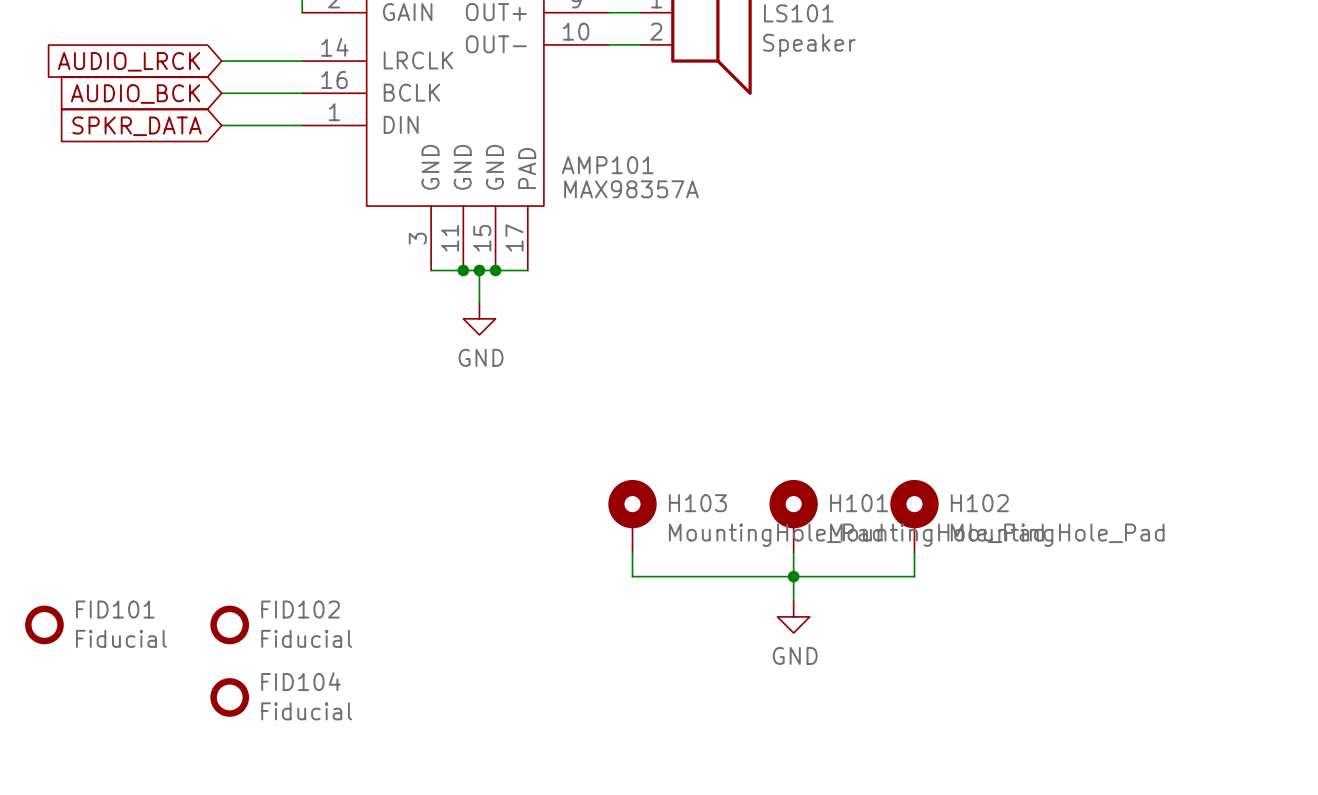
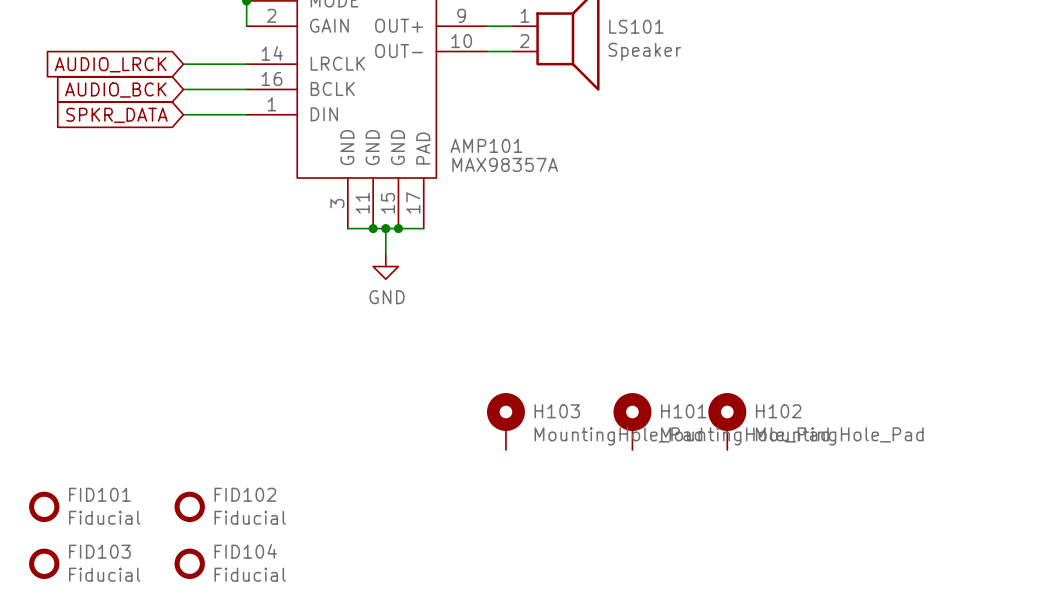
wire: (632, 552) (632, 576) (914, 576) (914, 552) -> none
wire: (793, 552) (793, 600) -> none
junction: (793, 576) -> none
power symbol: GND (793, 616) -> none
FID103: none -> Fiducial (44, 563)

